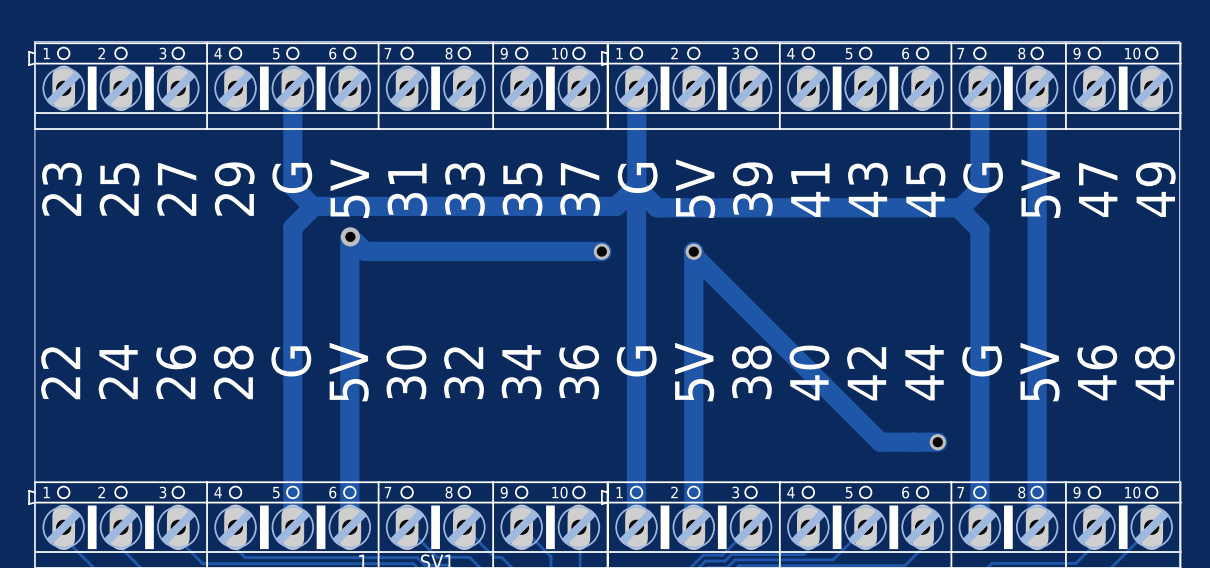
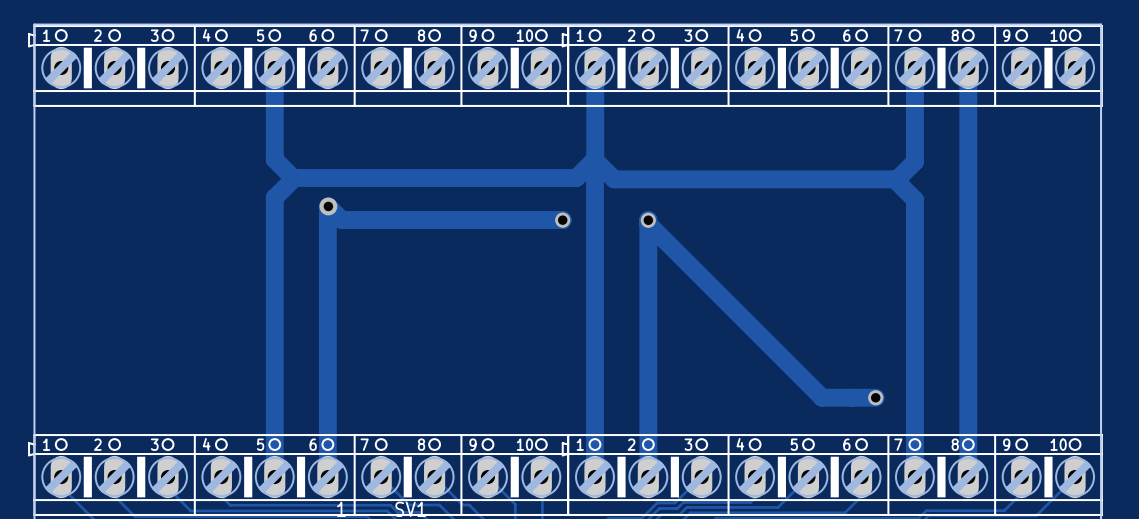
text: G (292, 178) -> none
text: G (637, 178) -> none
text: G (983, 178) -> none
text: 5V (350, 188) -> none
text: 5V (695, 188) -> none
text: 5V (1041, 188) -> none
text: 23 (61, 189) -> none
text: 25 (119, 189) -> none
text: 27 (176, 189) -> none
text: 29 (234, 189) -> none
text: 31 (407, 189) -> none
text: 33 (464, 189) -> none
text: 35 (522, 189) -> none
text: 37 (580, 189) -> none
text: 39 (752, 189) -> none
text: 43 (867, 189) -> none
text: 49 (1155, 189) -> none
text: 41 (810, 190) -> none
text: 45 (925, 190) -> none
text: 47 (1098, 190) -> none
text: G (291, 361) -> none
text: G (636, 361) -> none
text: G (982, 361) -> none
text: 24 (118, 372) -> none
text: 26 (176, 372) -> none
text: 28 (233, 372) -> none
text: 5V (349, 372) -> none
text: 30 (406, 372) -> none
text: 34 (521, 372) -> none
text: 36 (579, 372) -> none
text: 5V (694, 372) -> none
text: 38 (751, 372) -> none
text: 40 (809, 372) -> none
text: 44 (924, 372) -> none
text: 5V (1040, 372) -> none
text: 46 (1097, 372) -> none
text: 22 (60, 373) -> none
text: 32 (464, 373) -> none
text: 42 (866, 373) -> none
text: 48 (1154, 373) -> none

